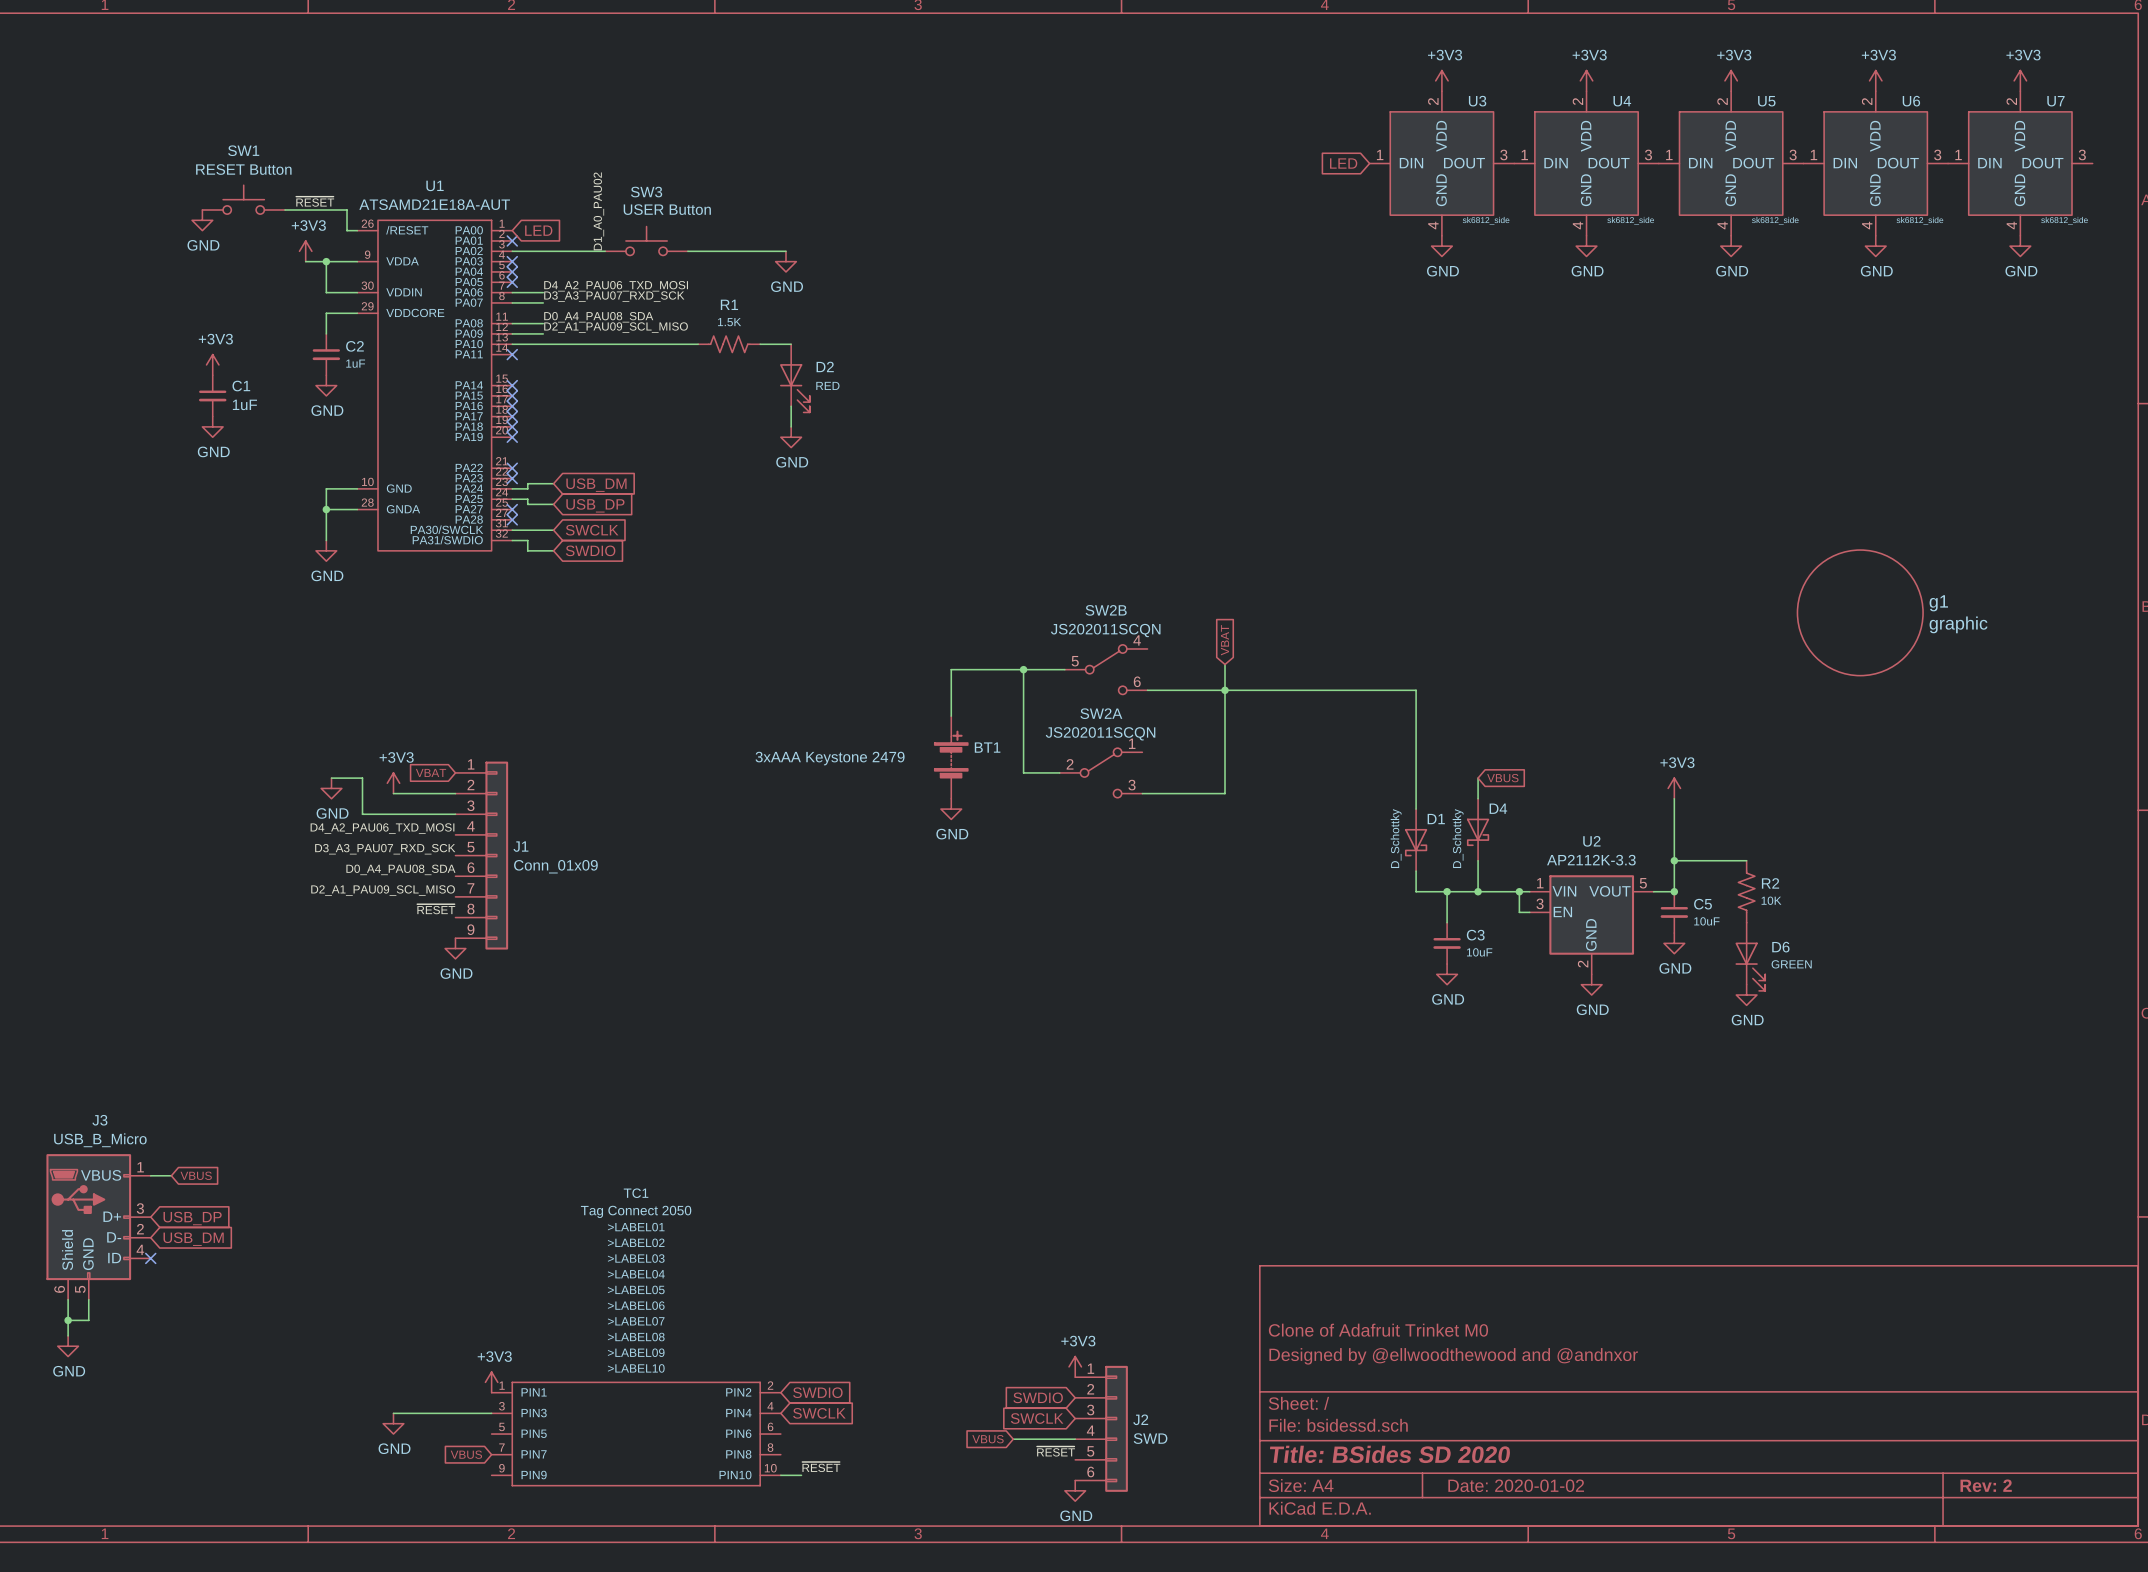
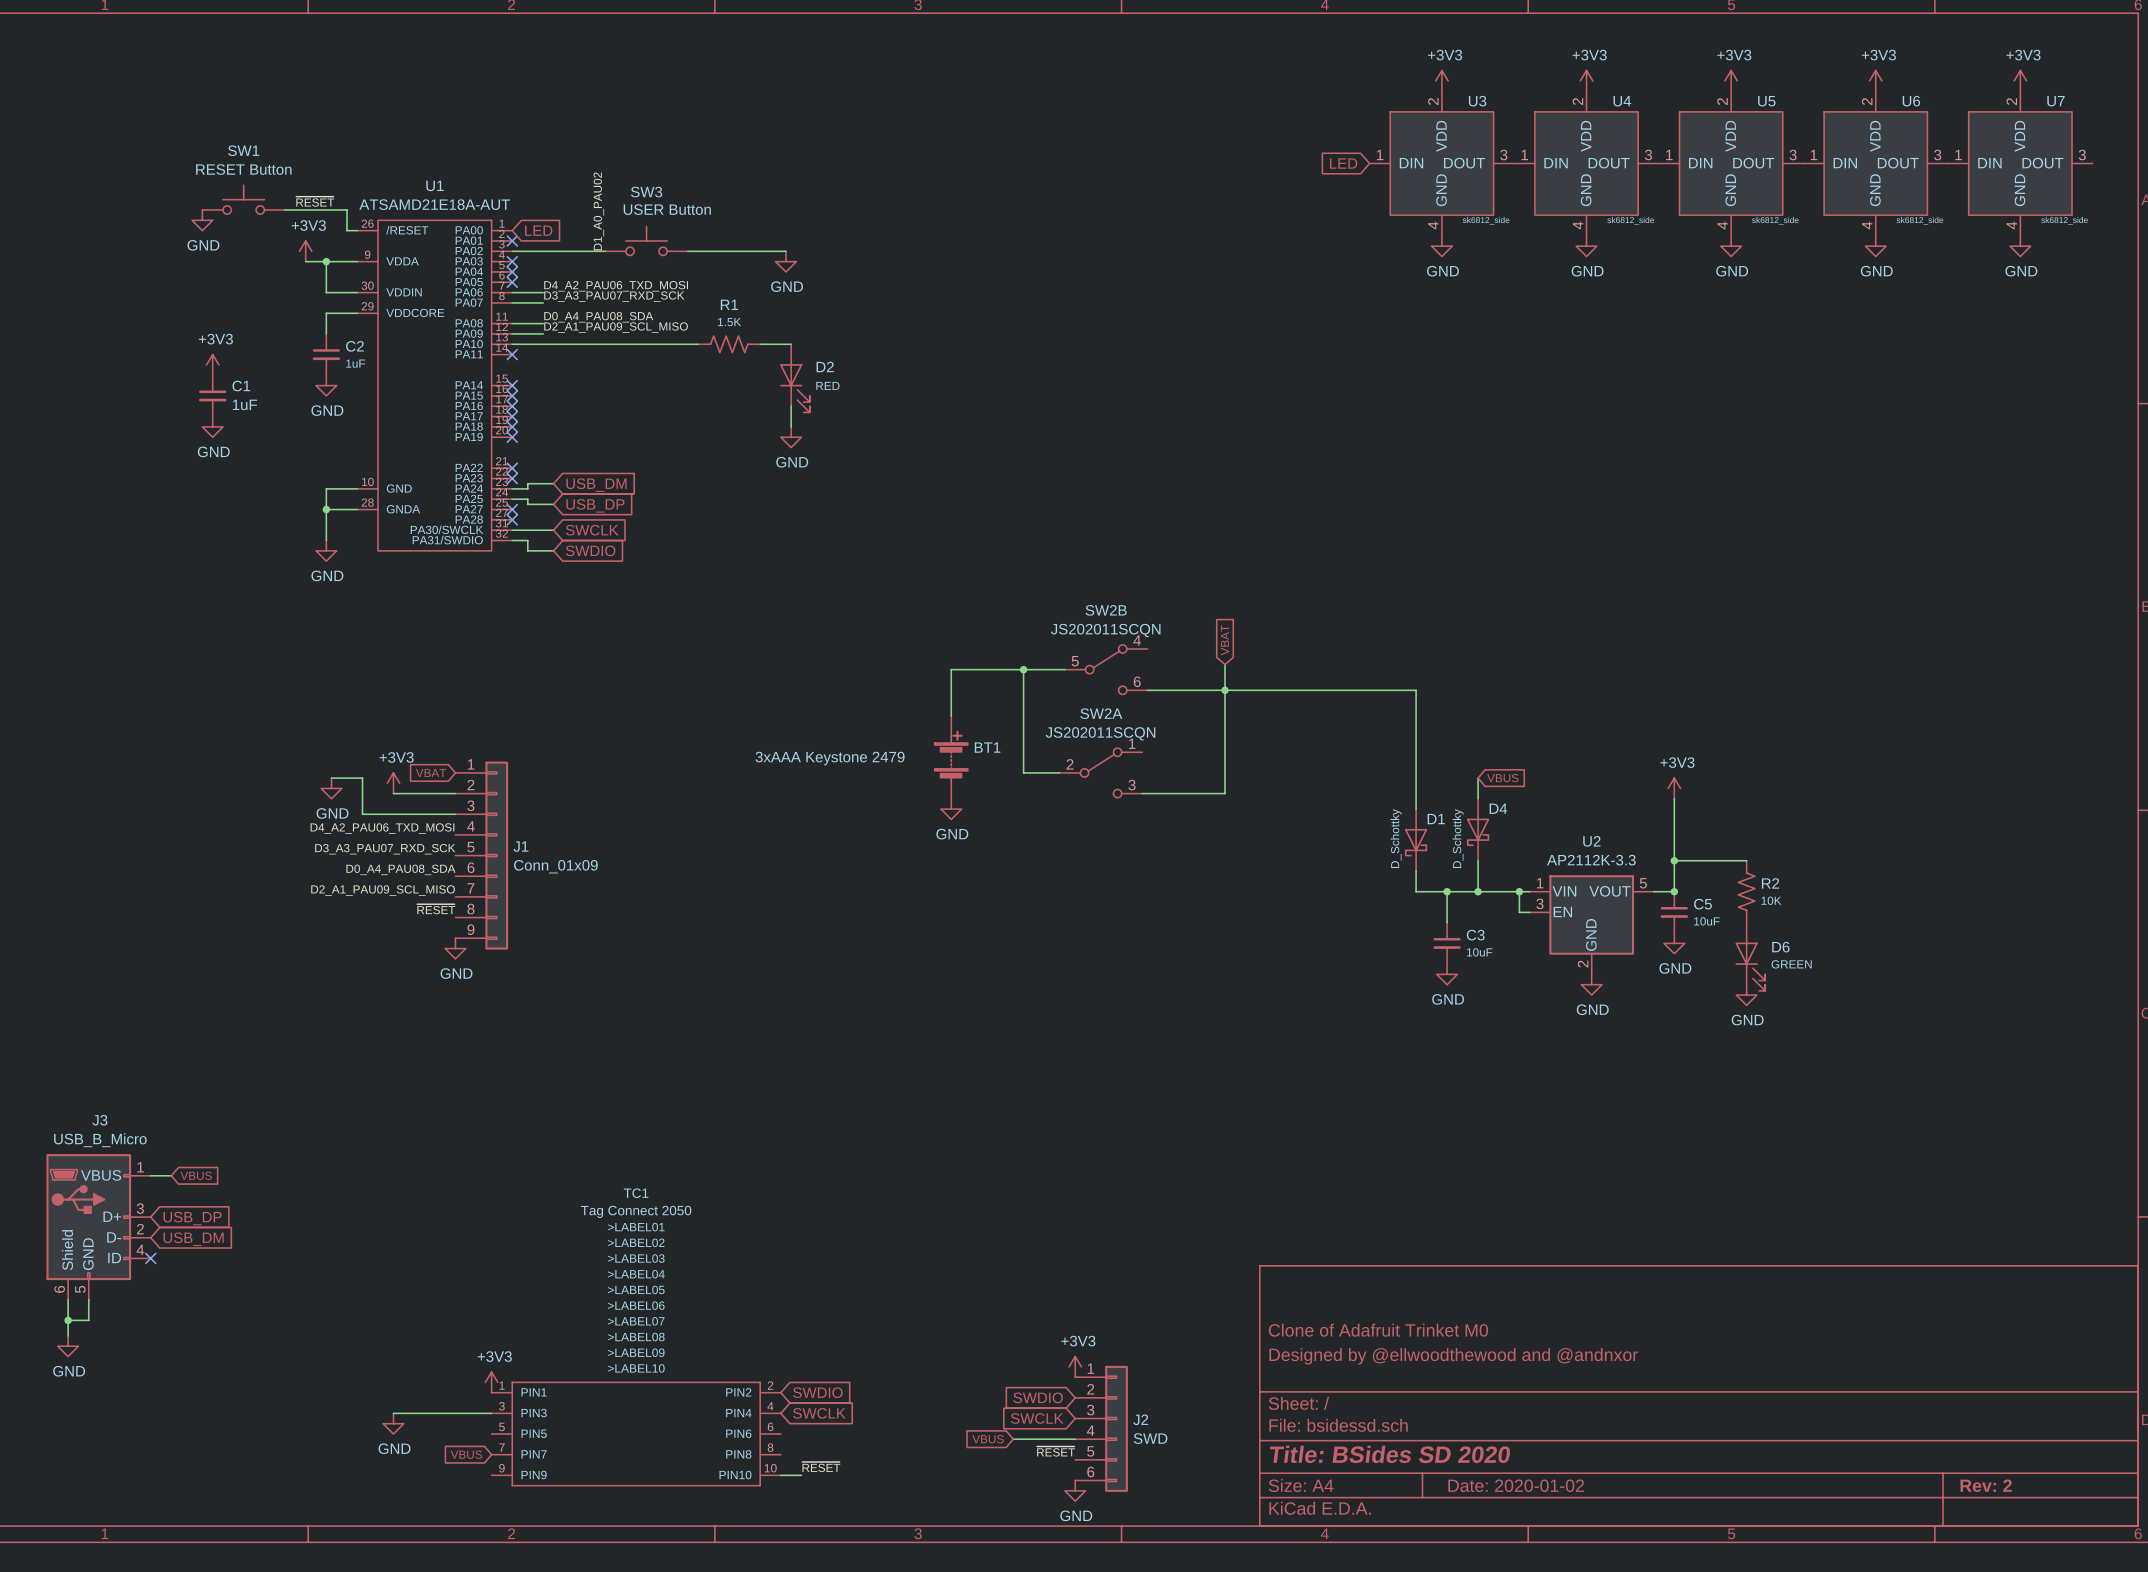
g1: graphic (1860, 612) -> none

